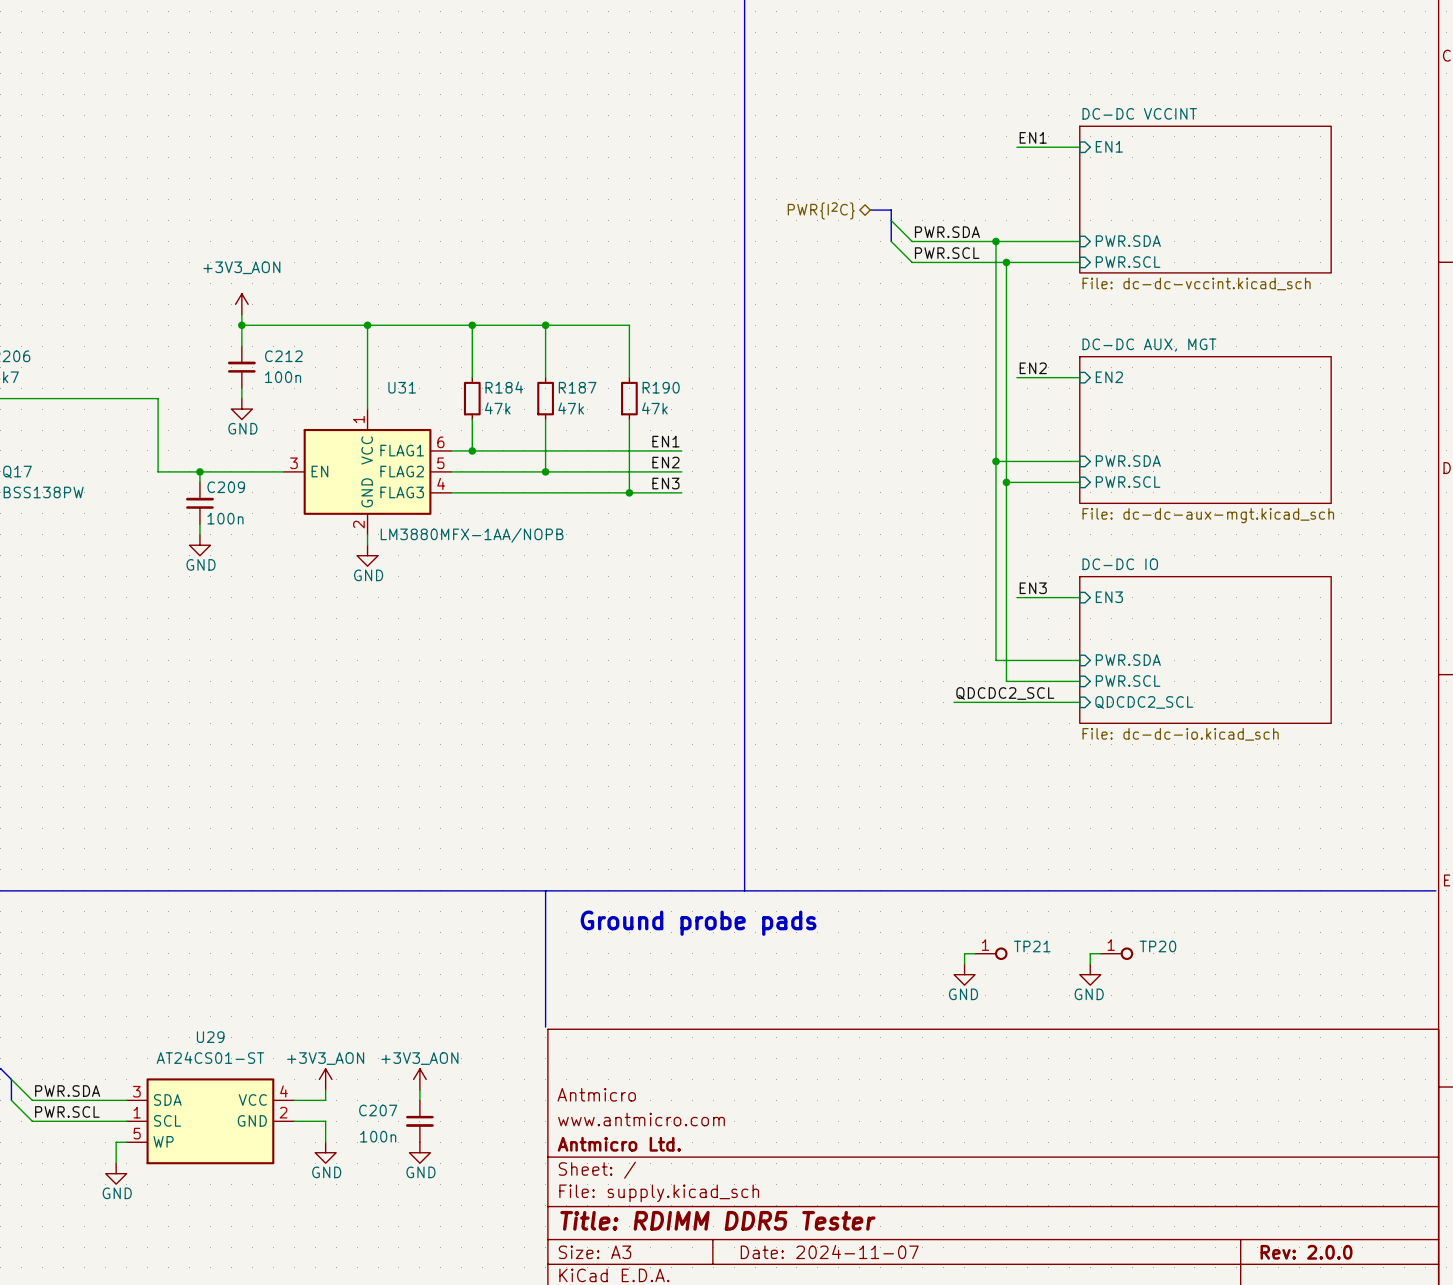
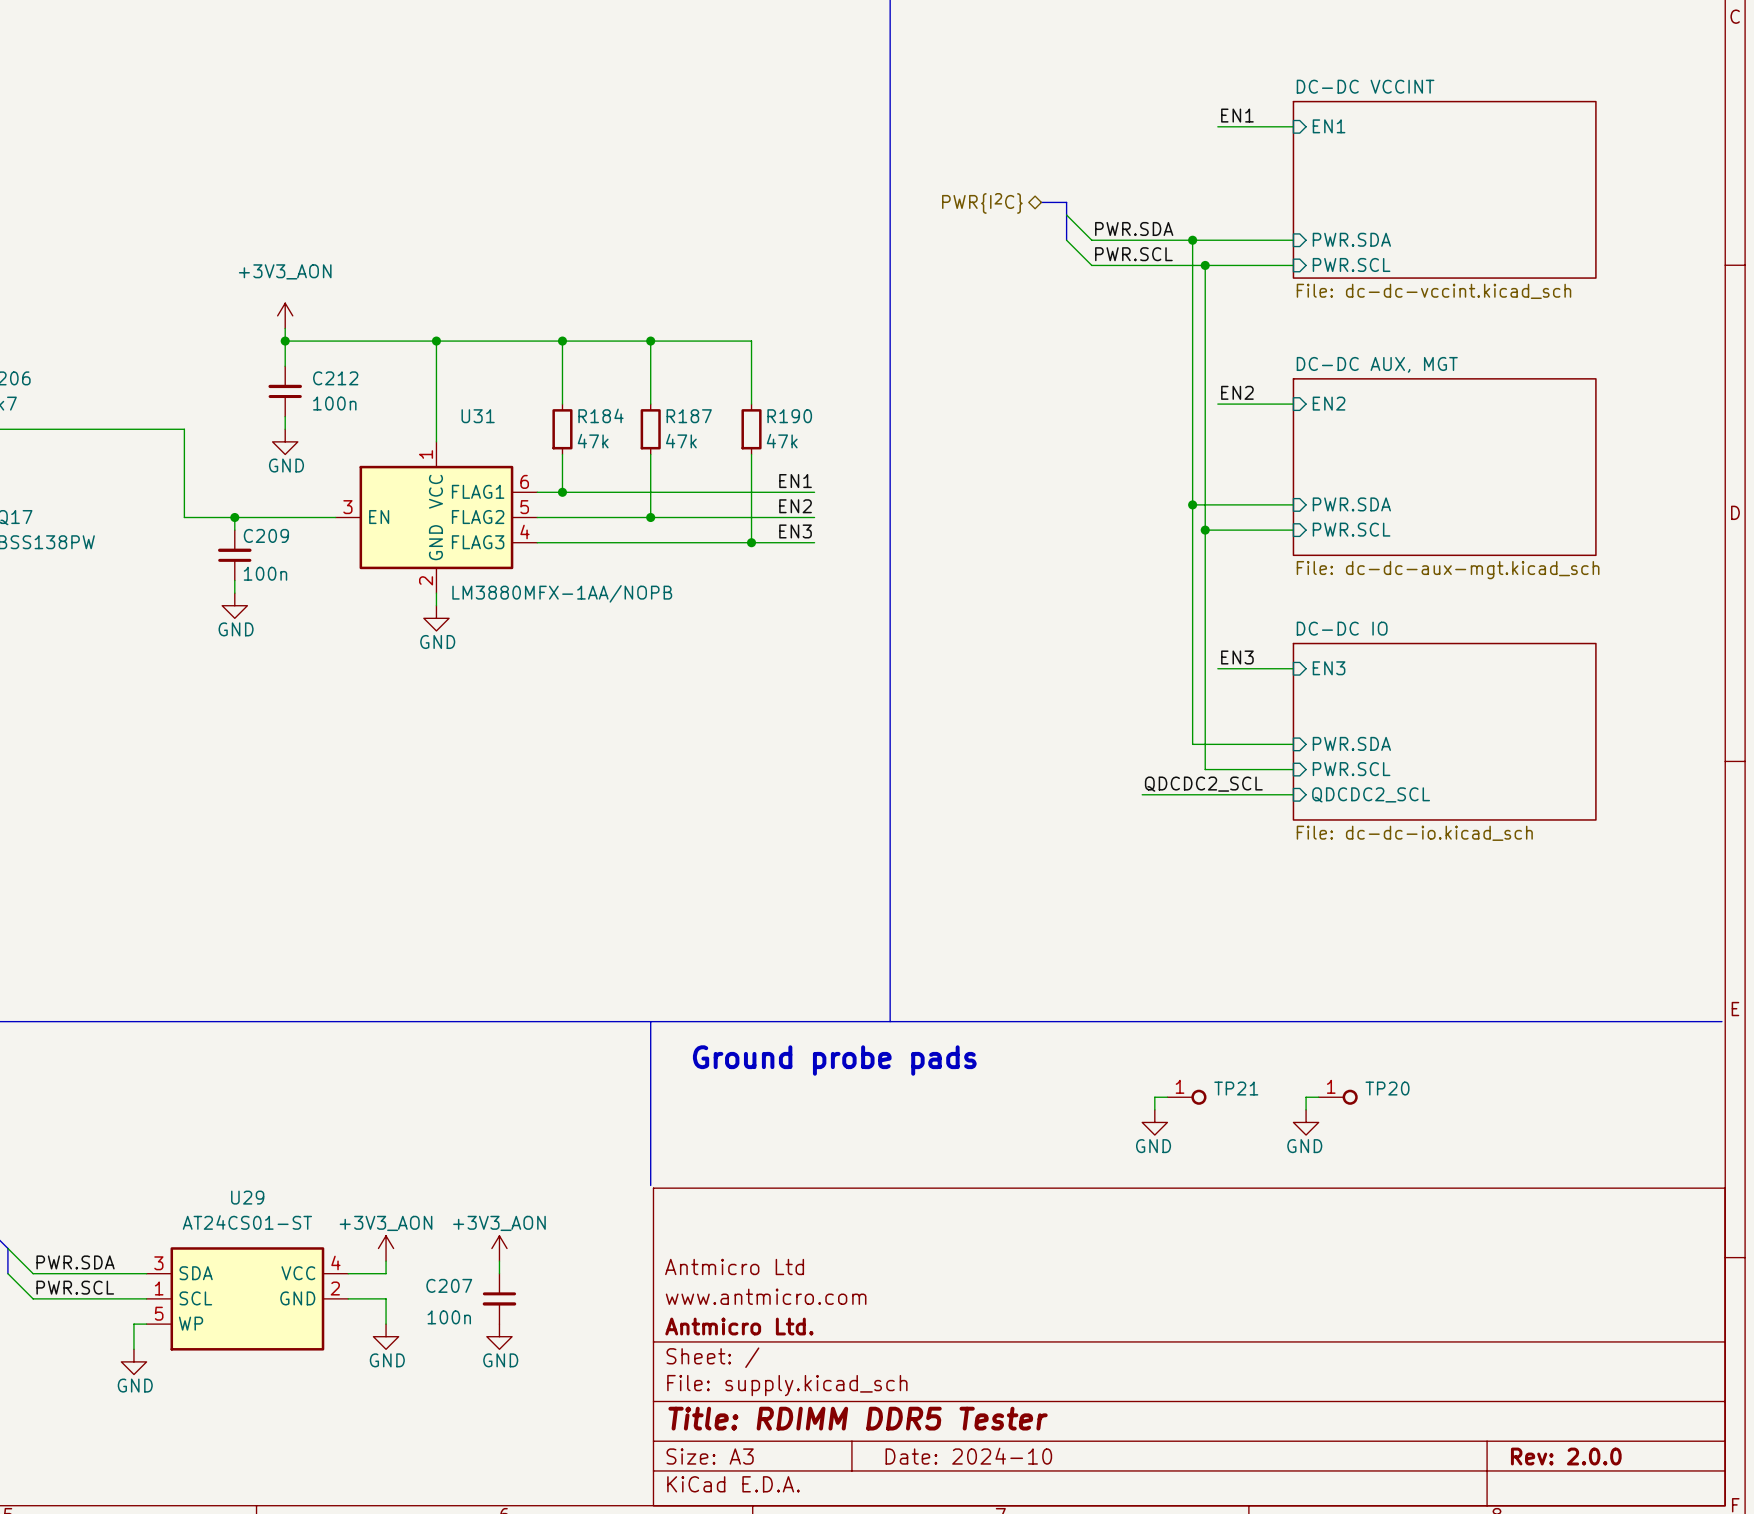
title block: Antmicro (596, 1094) -> Antmicro Ltd (734, 1266)
title block: Date: 2024-11-07 (829, 1252) -> Date: 2024-10 (968, 1456)

